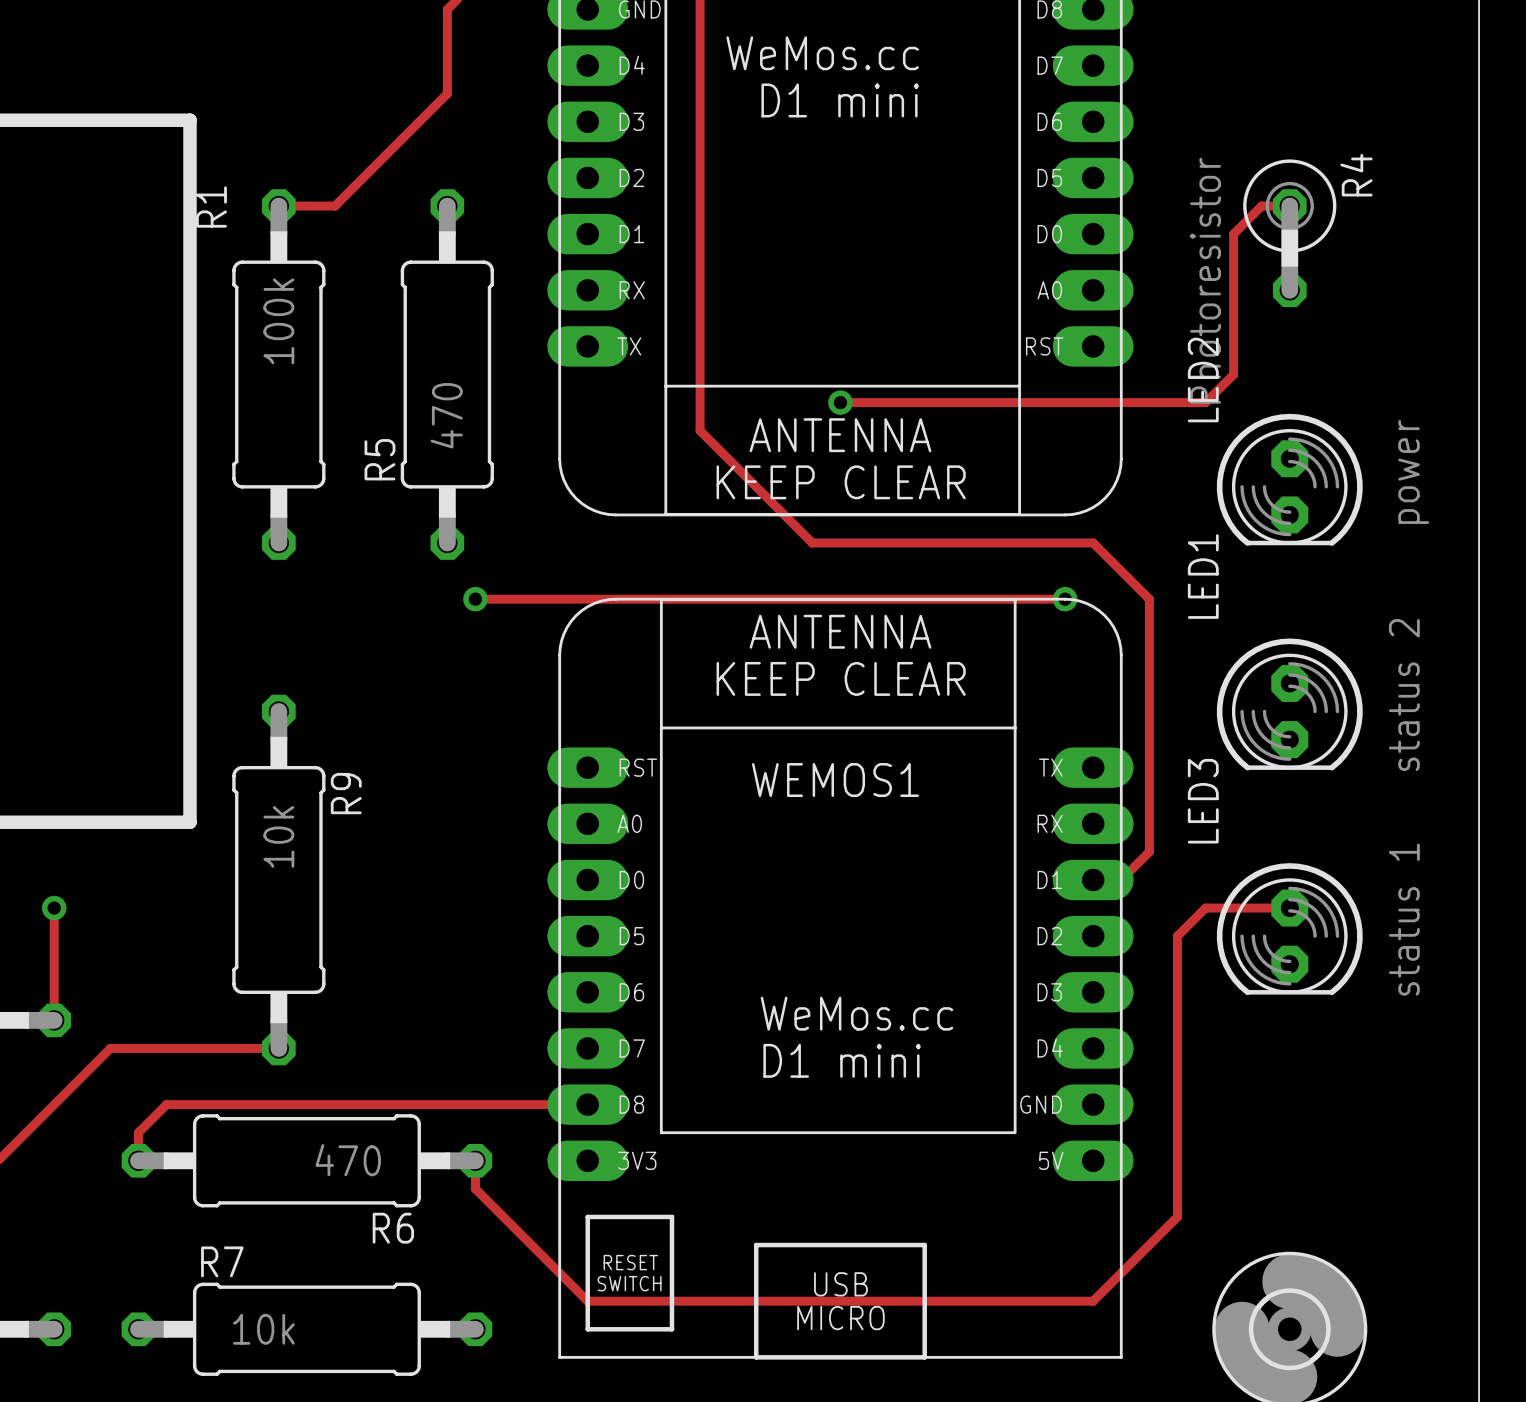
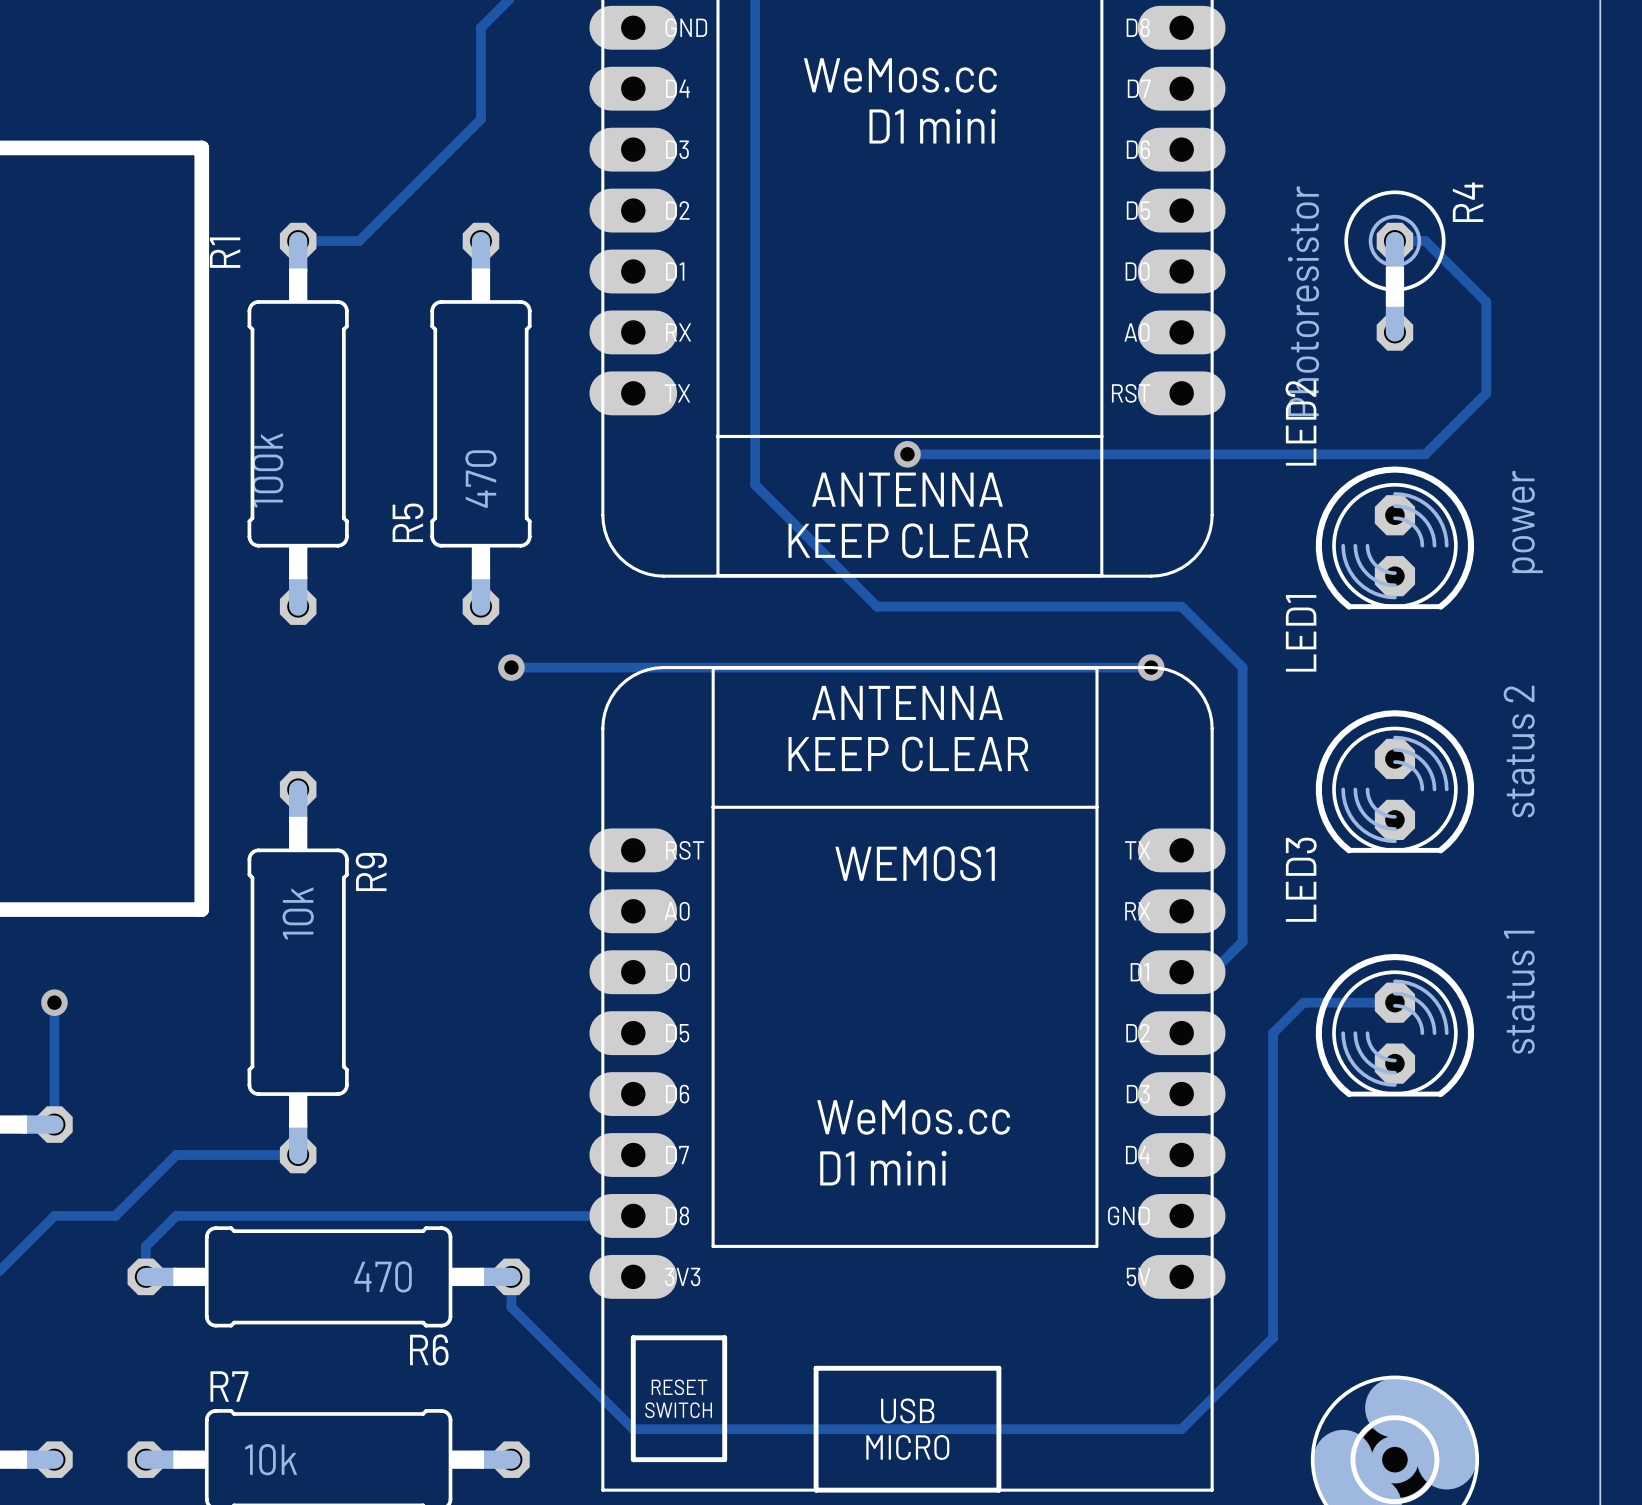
track: (1289, 206) (1261, 206) (1233, 234) (1233, 374) (1205, 402) -> (1394, 241) (1425, 241) (1486, 301) (1486, 393) (1425, 454) (1303, 454)
R1 value position: 100k (278, 321) -> 100k (267, 470)
track: (166, 1048) (110, 1048) (54, 1104) -> (176, 1155) (115, 1215) (54, 1215)

